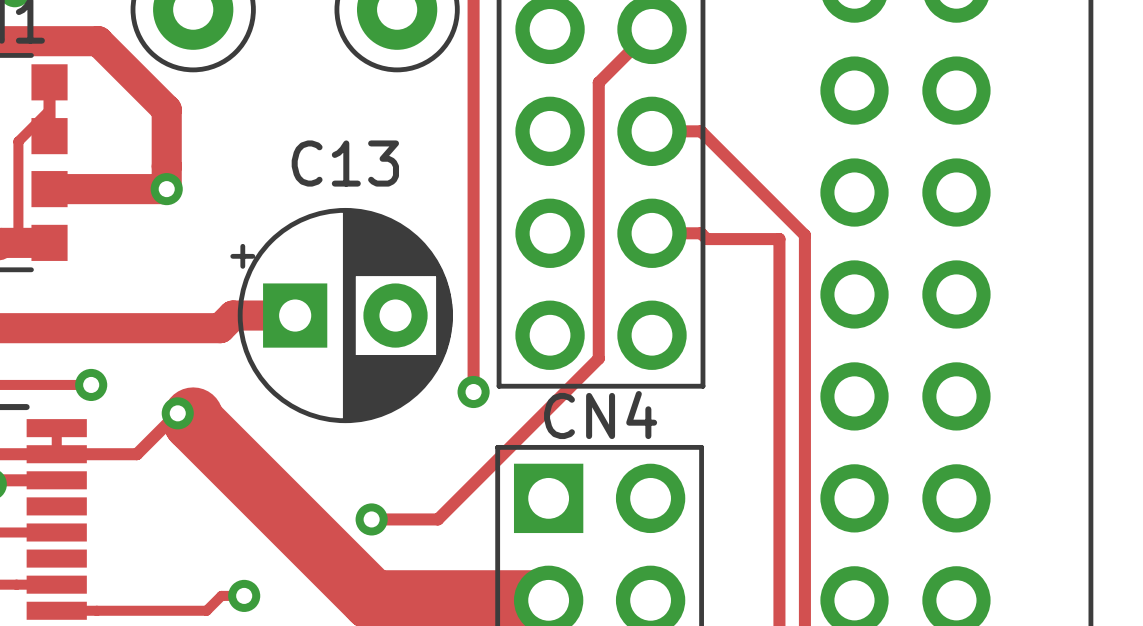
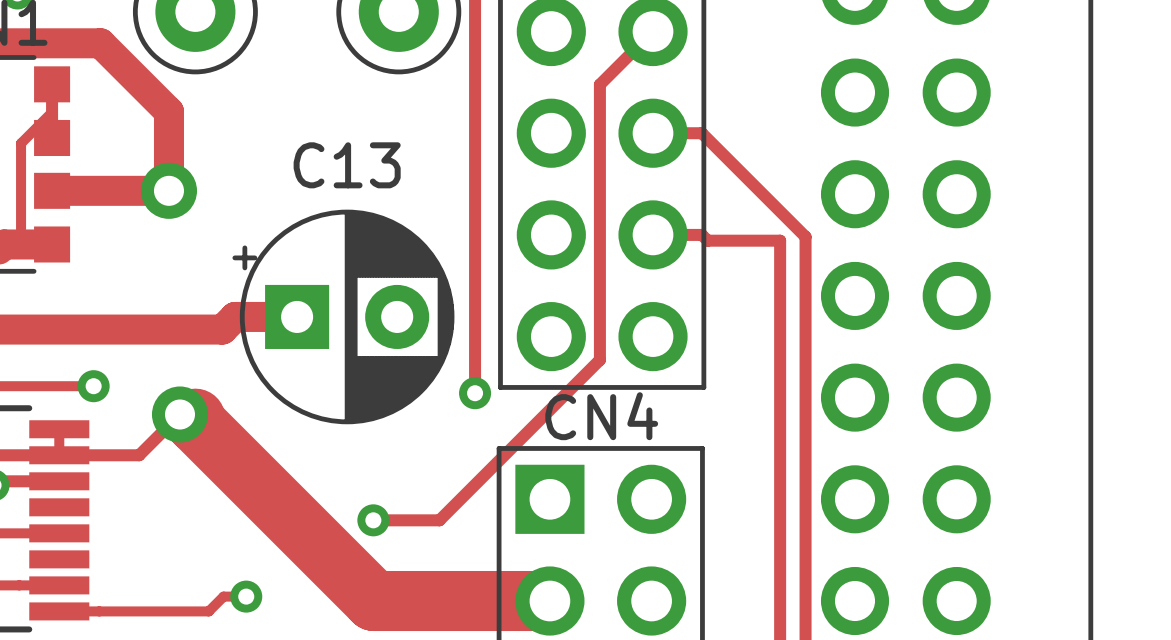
via size: [150, 173, 183, 206] -> [140, 162, 198, 219]
via size: [161, 397, 194, 430] -> [151, 386, 209, 443]

